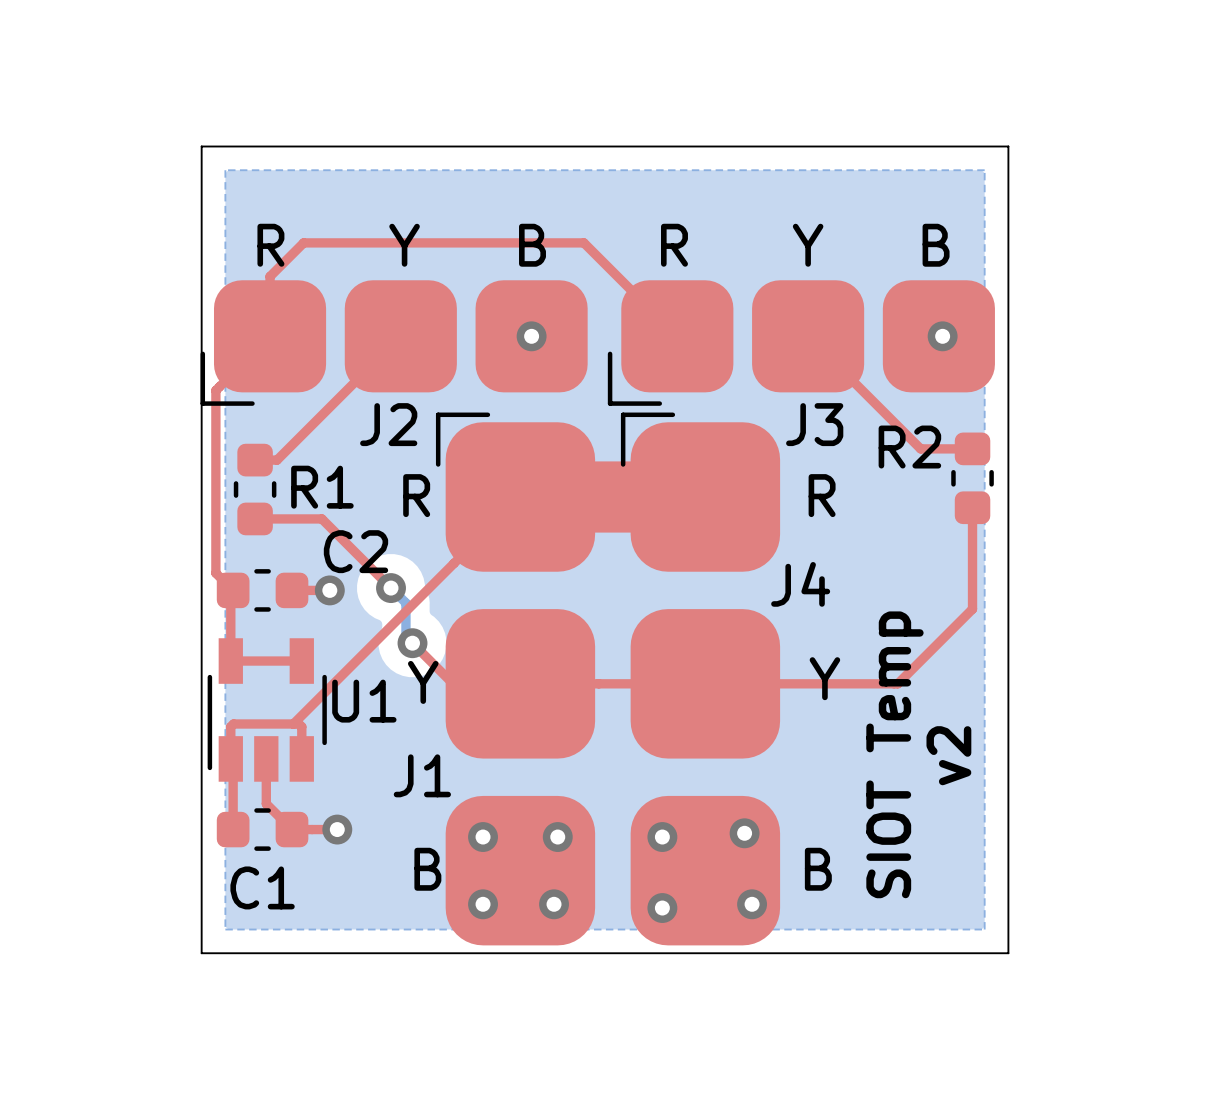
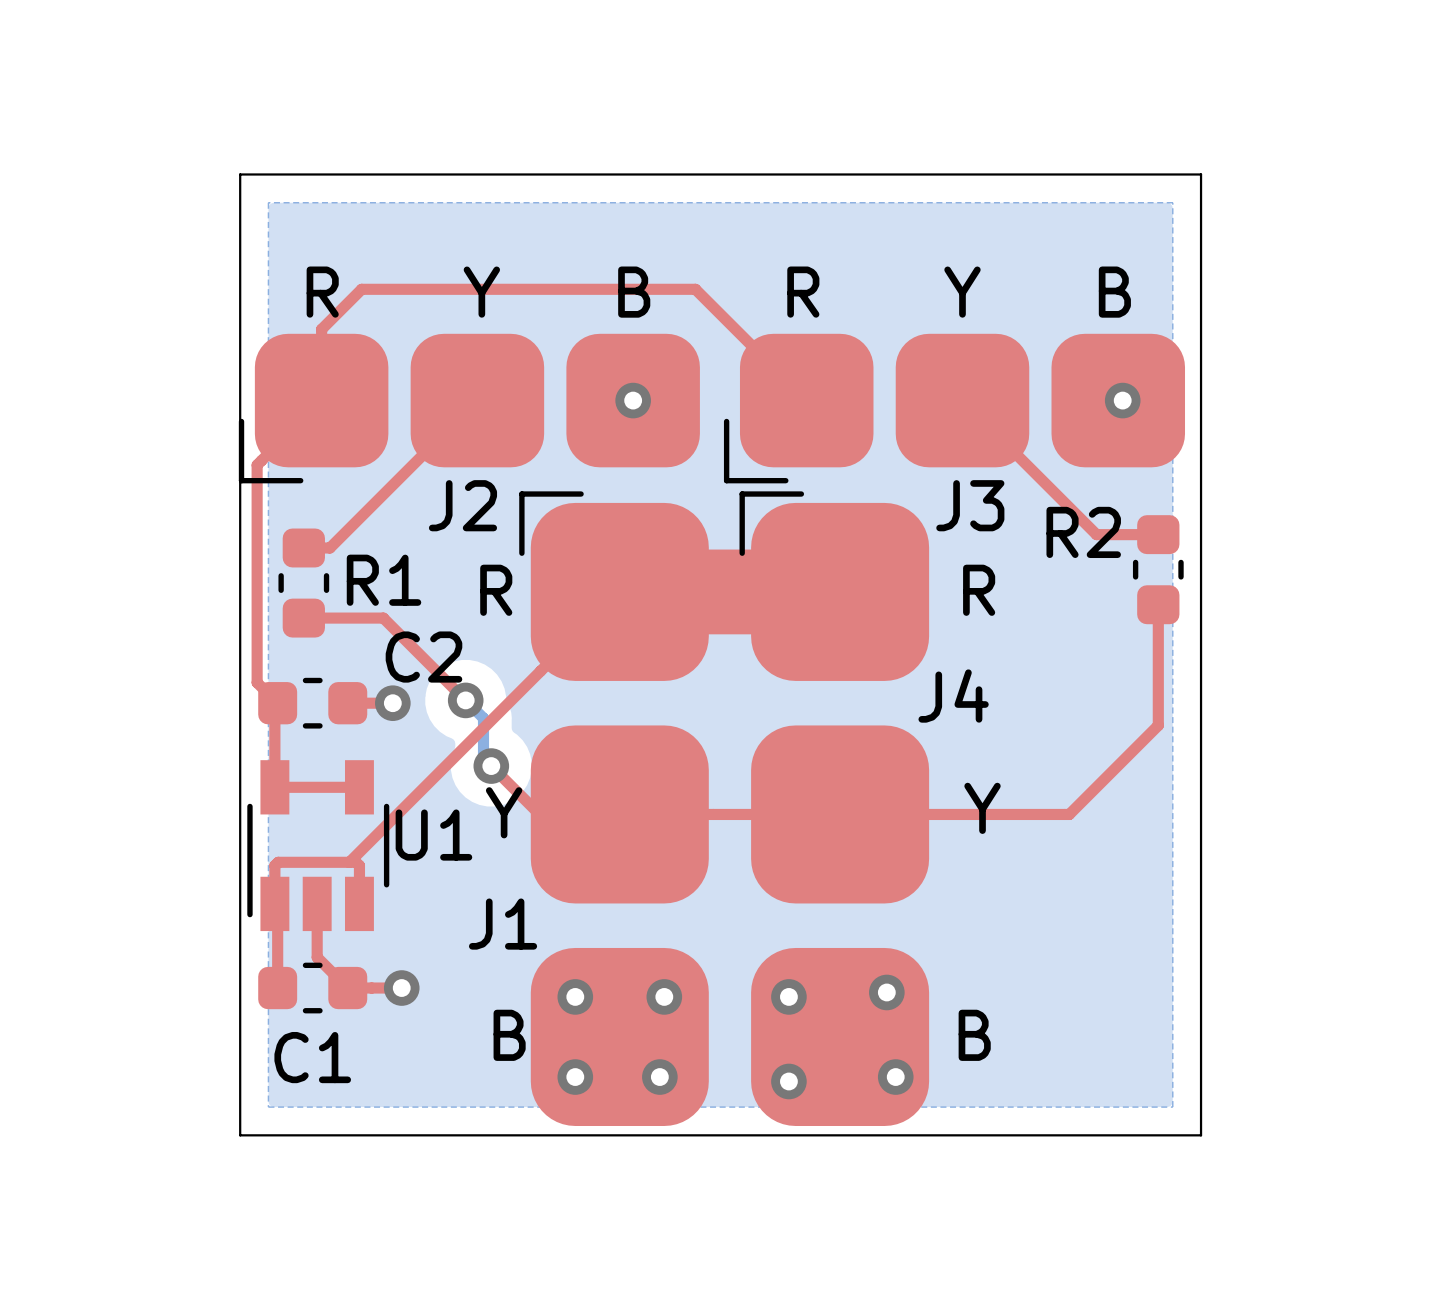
text: SIOT Temp (894, 754) -> none
text: v2 (948, 755) -> none

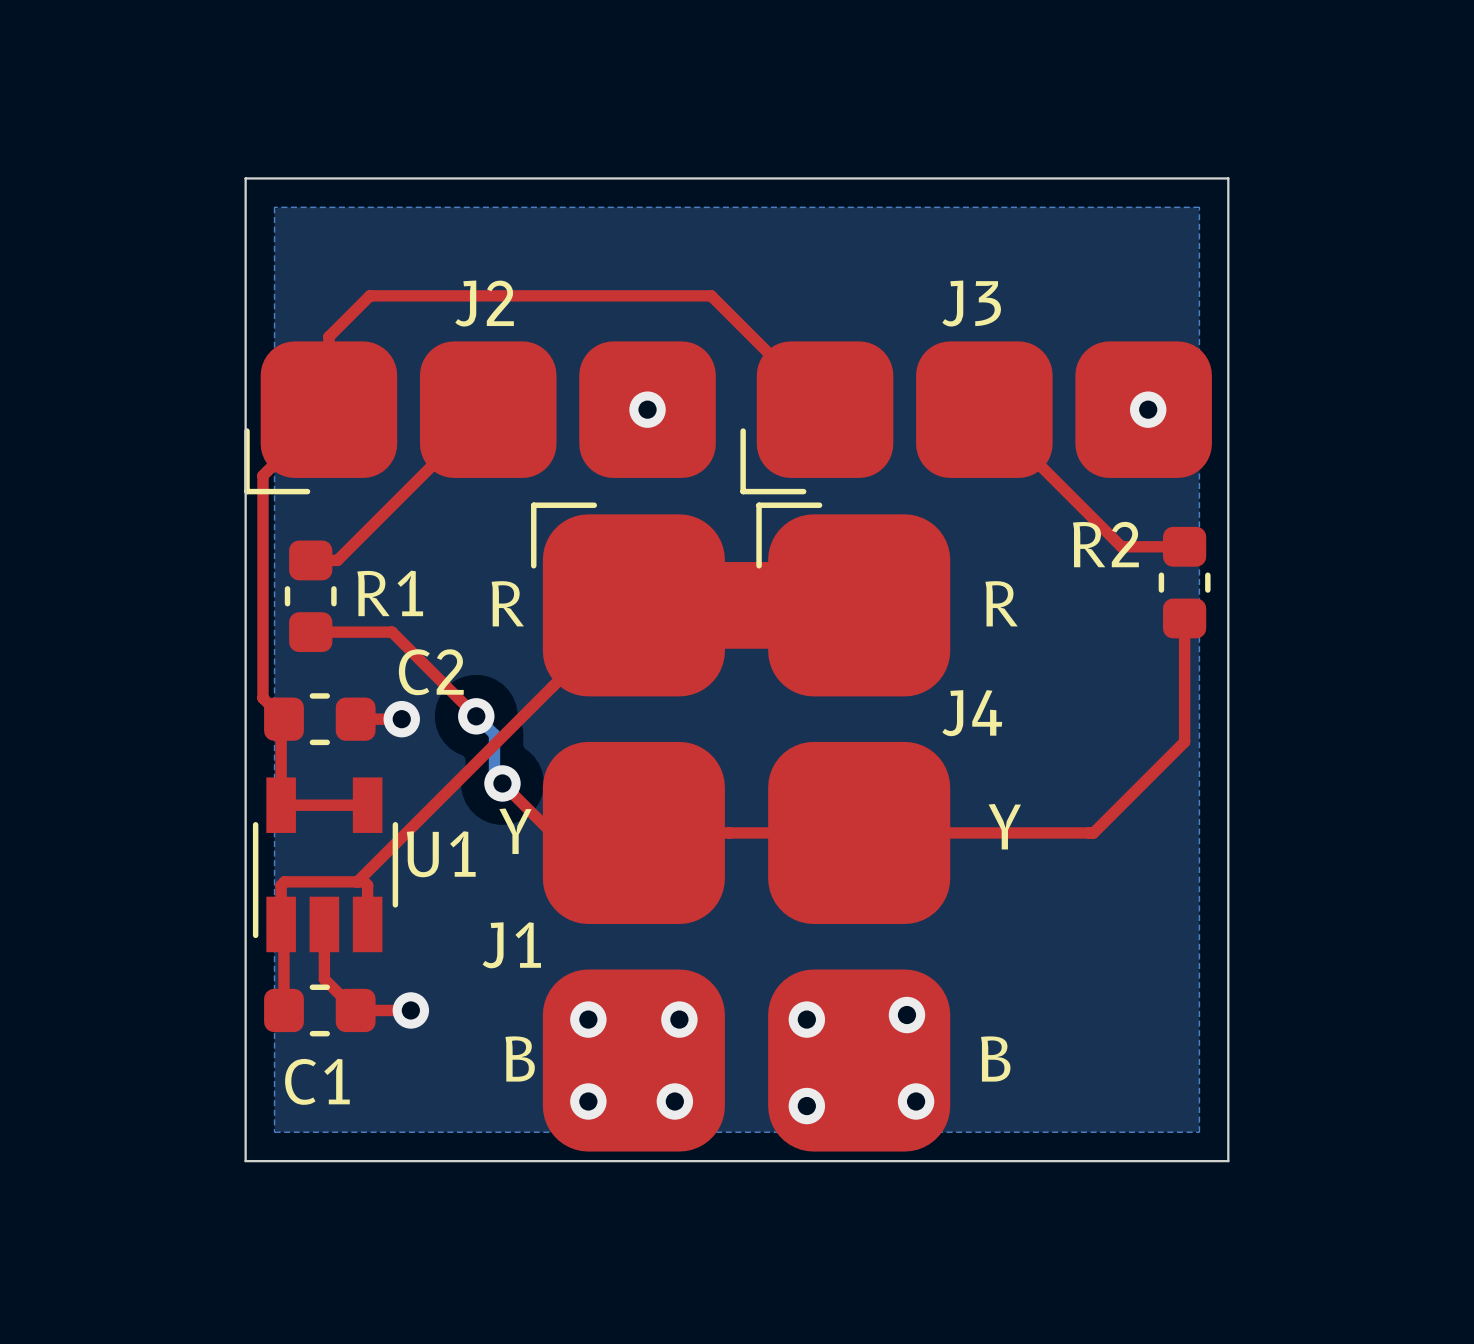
text: R (322, 292) -> none
text: Y (481, 292) -> none
text: B (634, 292) -> none
text: R (803, 292) -> none
text: Y (962, 292) -> none
text: B (1114, 292) -> none
J2 name position: J2 (462, 505) -> J2 (484, 303)
J3 name position: J3 (970, 505) -> J3 (971, 303)

